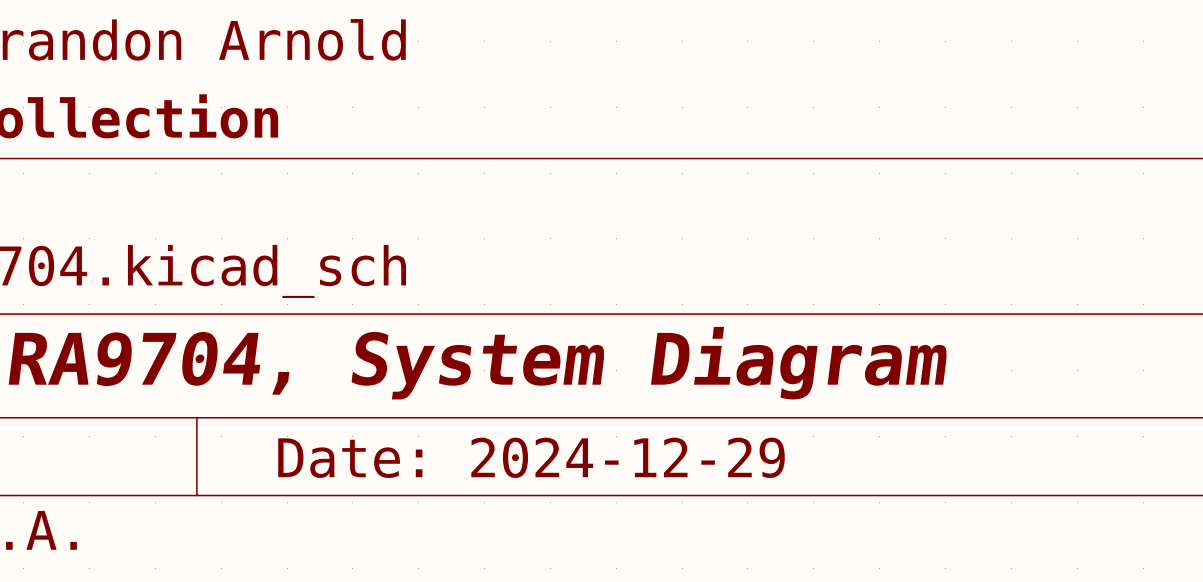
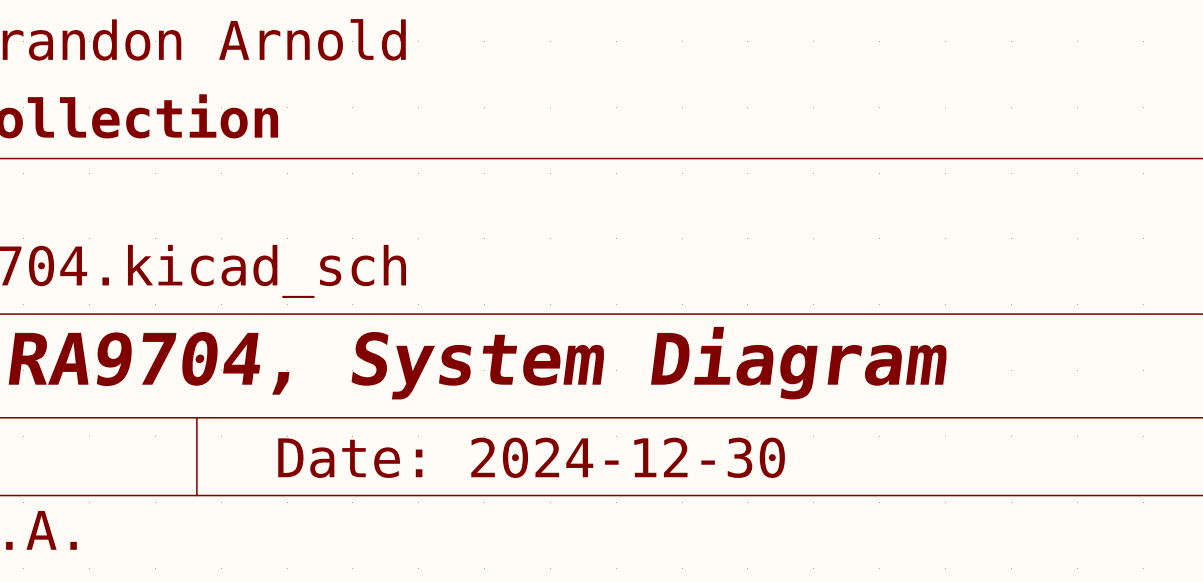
title block: Date: 2024-12-29 (531, 457) -> Date: 2024-12-30 (531, 457)

